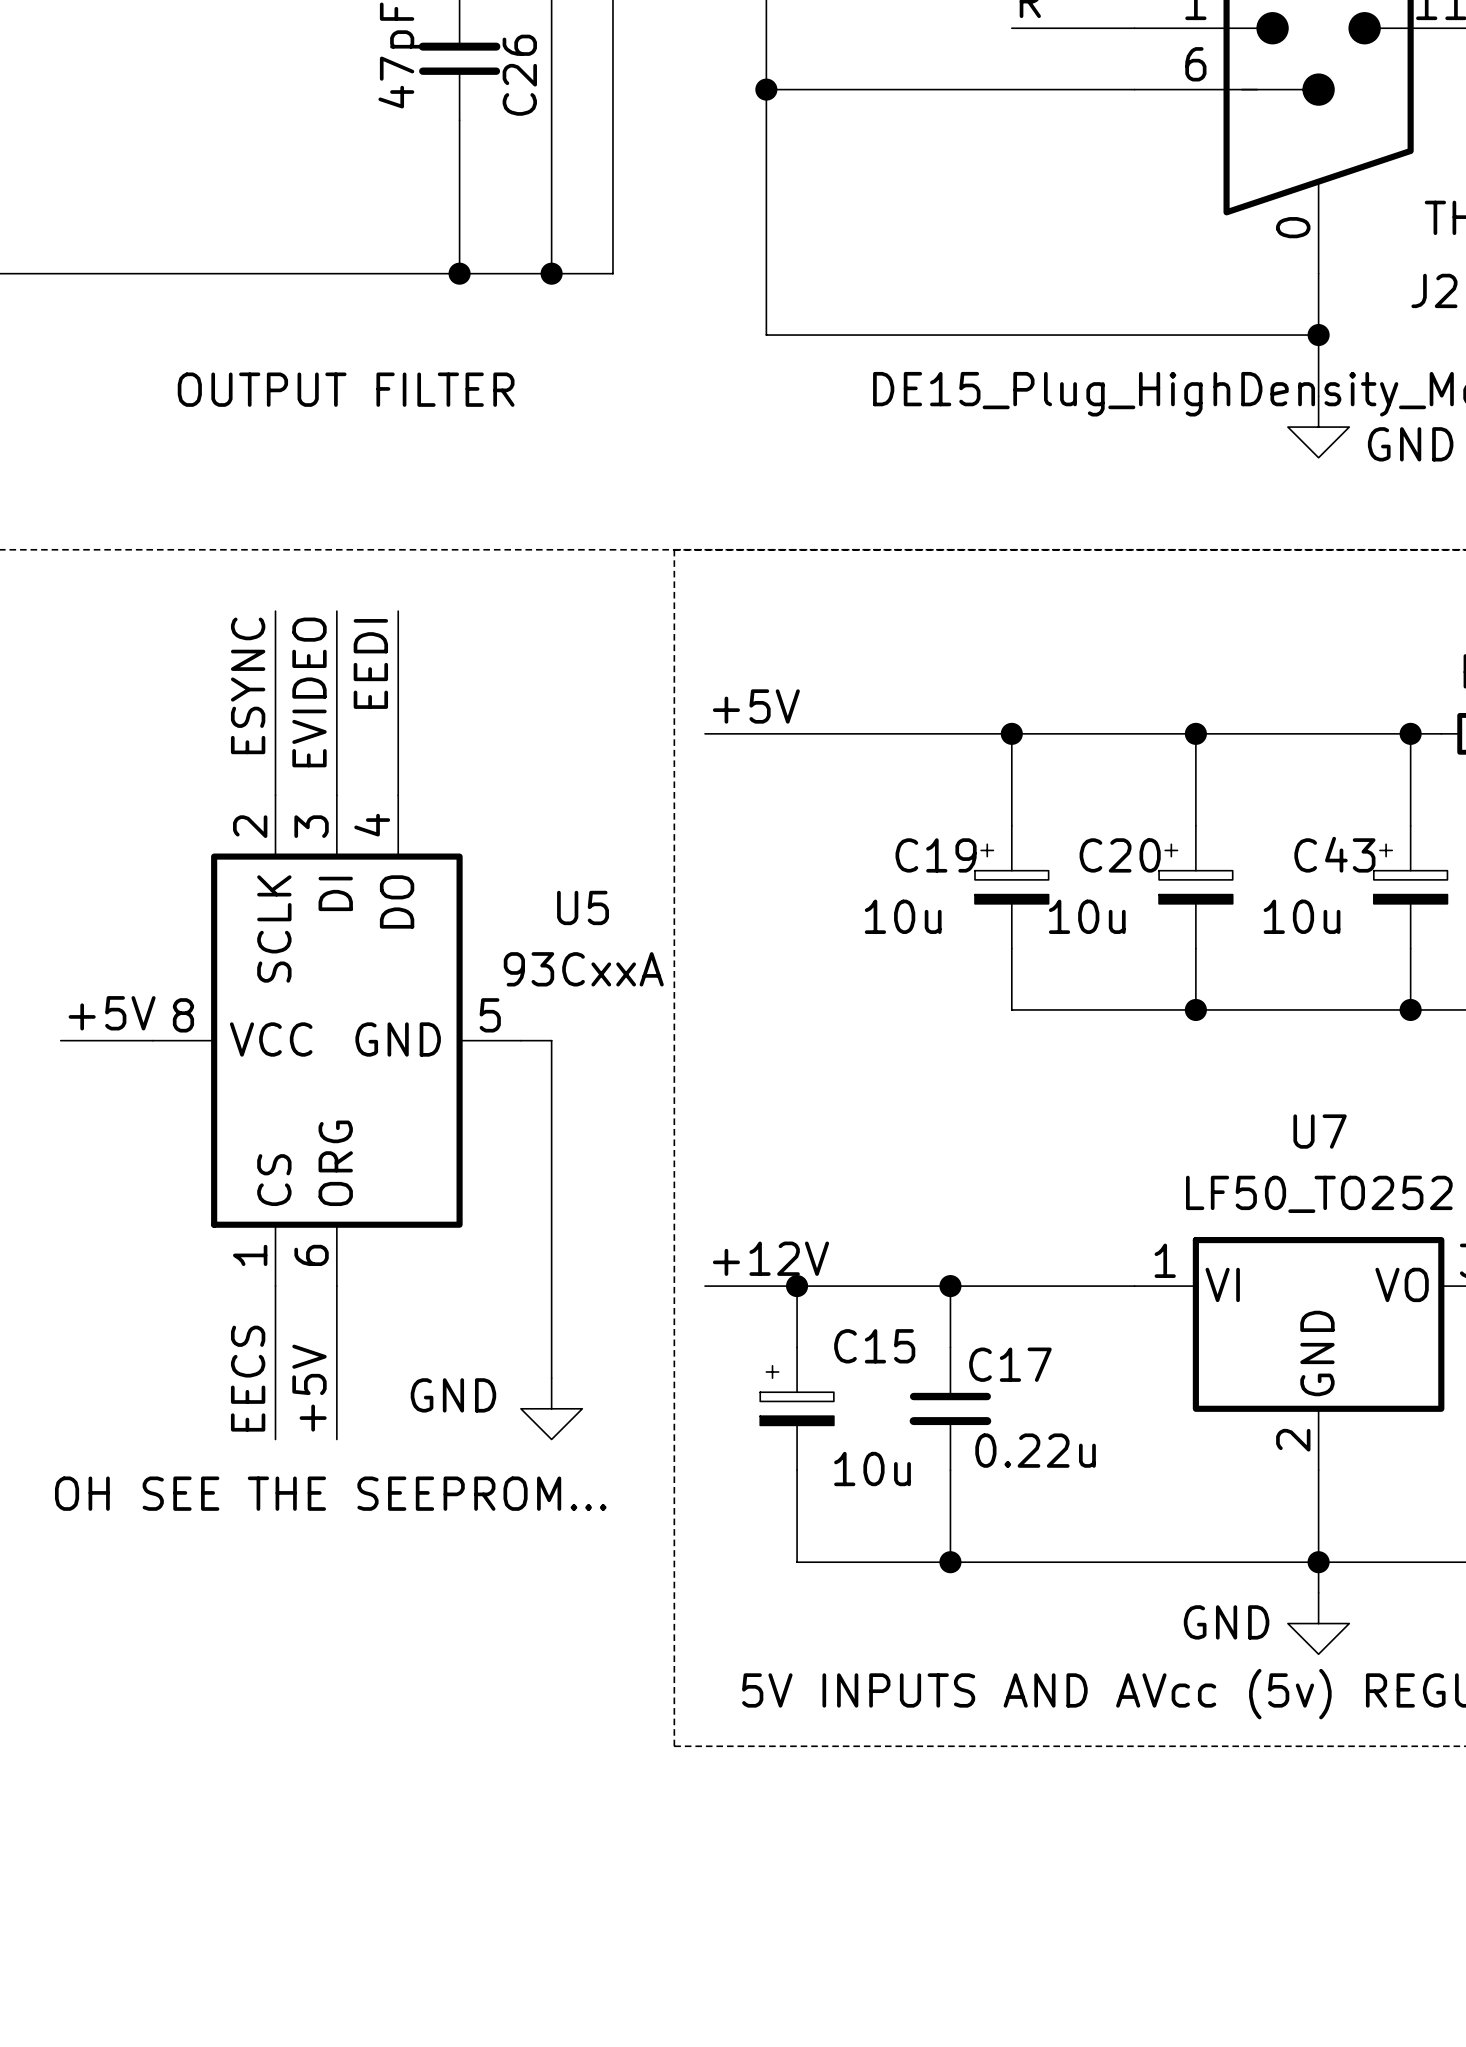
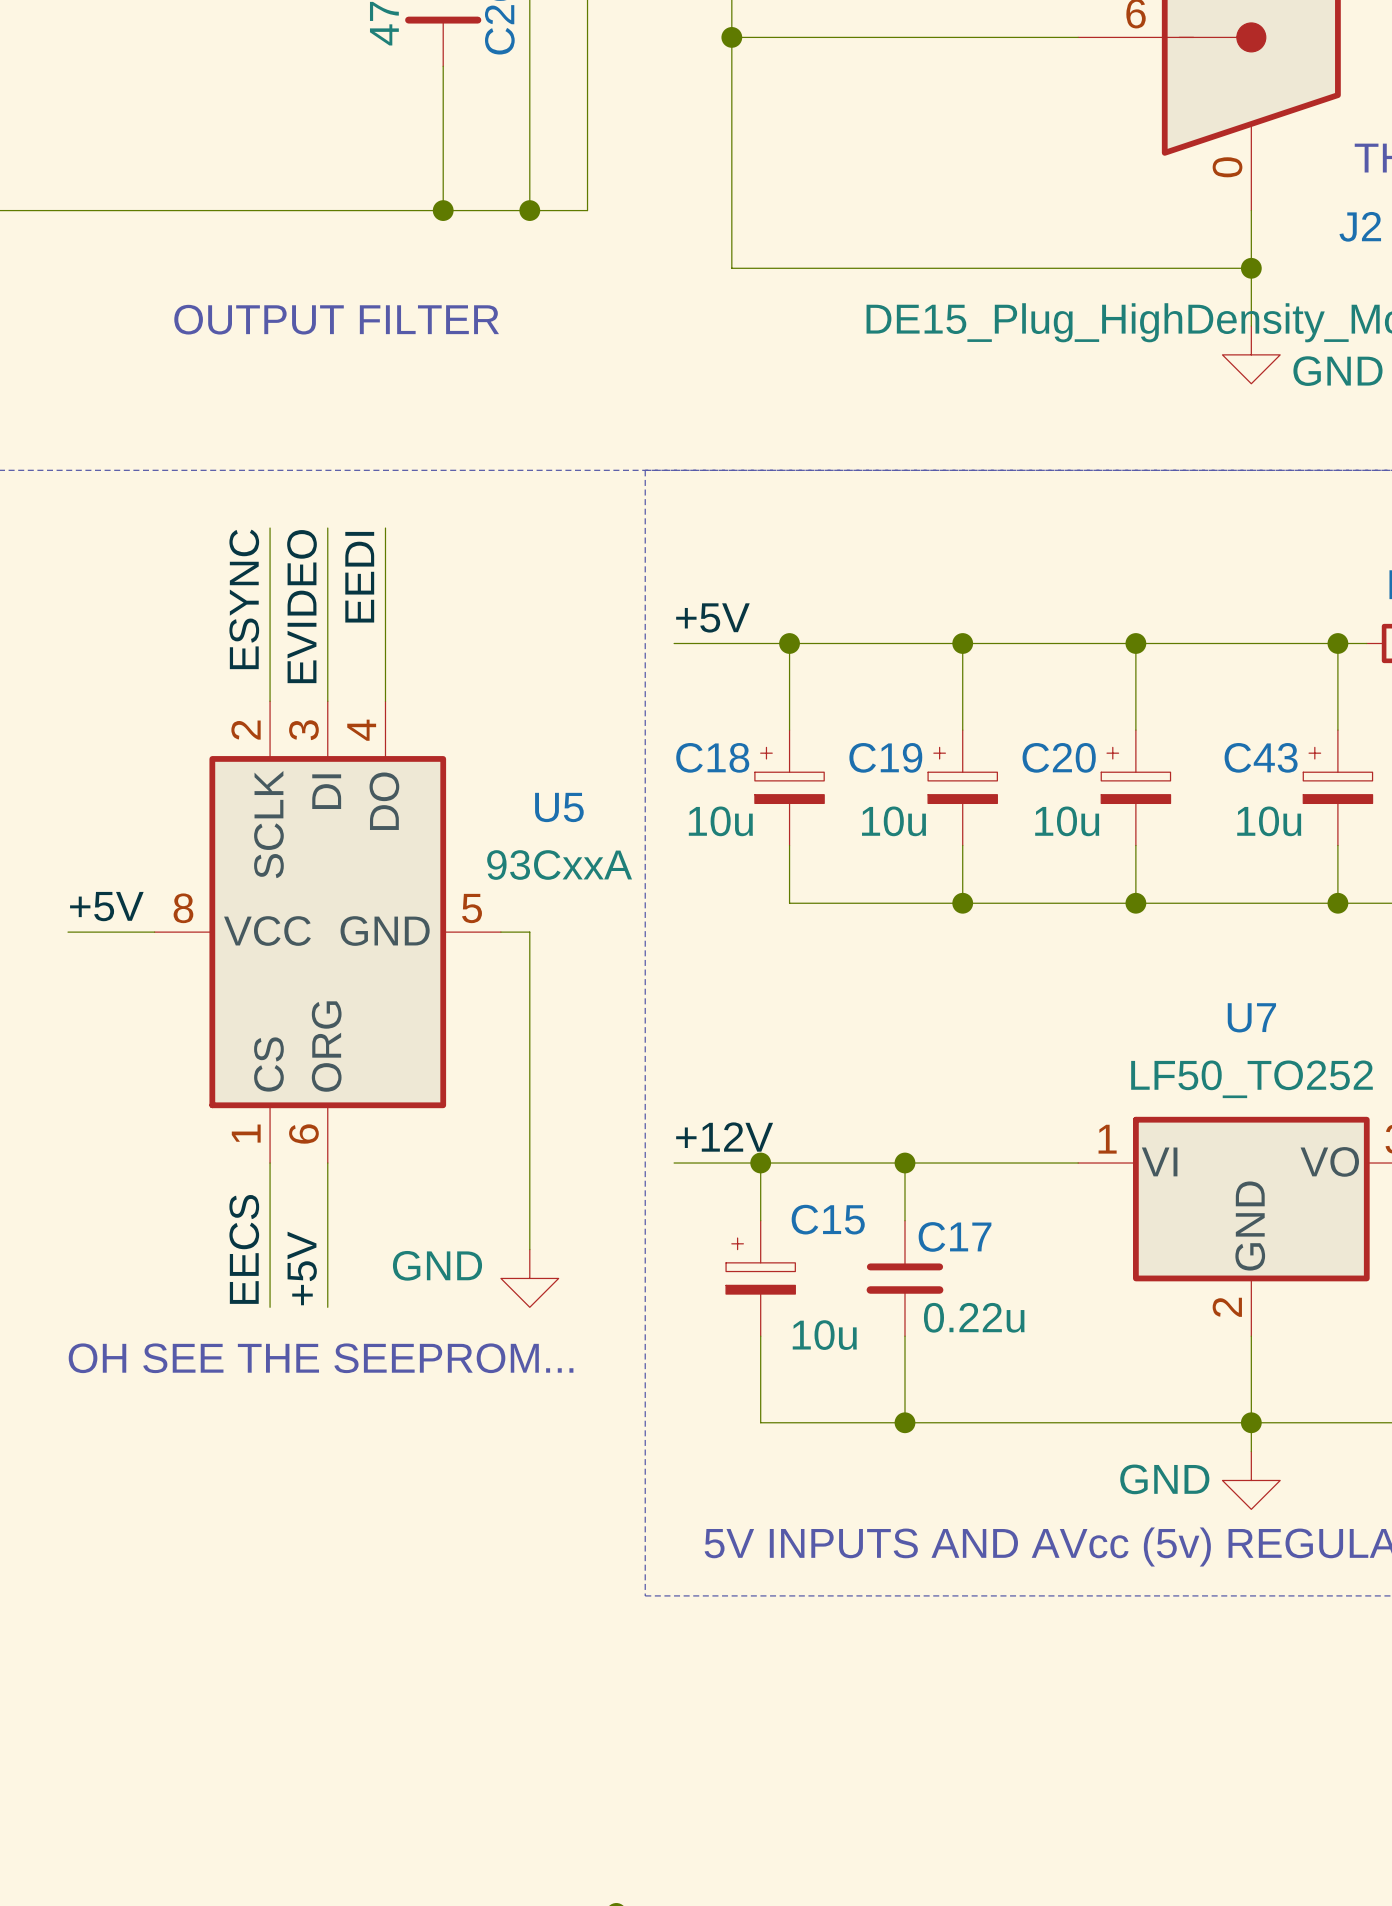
wire: none -> (789, 643) (789, 730)
junction: none -> (789, 643)
C18: none -> 10u (789, 787)
C19 value position: 10u (903, 916) -> 10u (894, 821)
C20 value position: 10u (1087, 916) -> 10u (1067, 821)
C43 value position: 10u (1302, 916) -> 10u (1269, 821)
wire: none -> (789, 845) (789, 903) (962, 903)
junction: none -> (962, 903)

